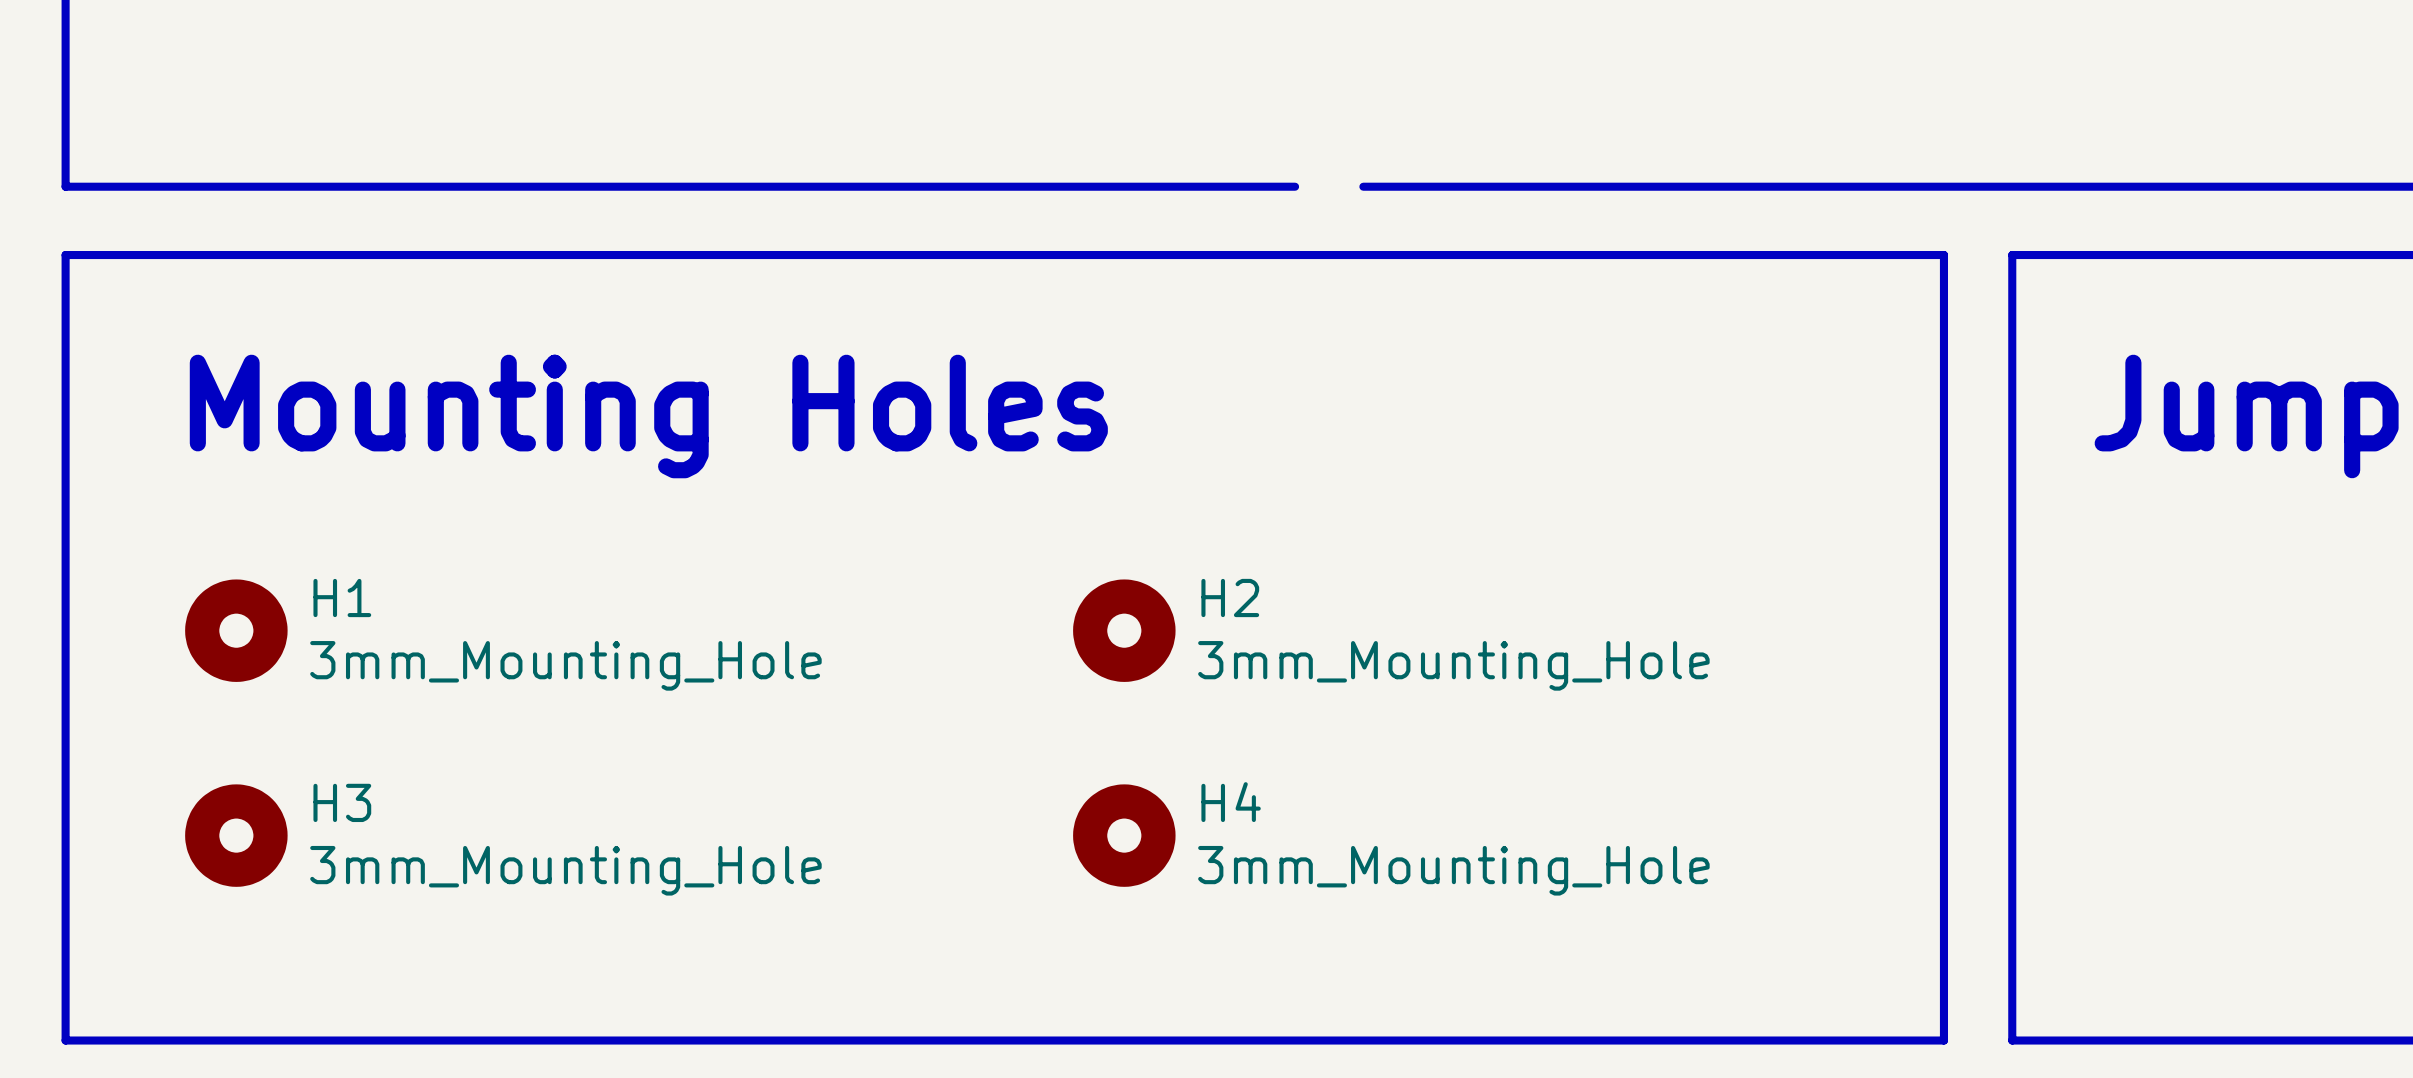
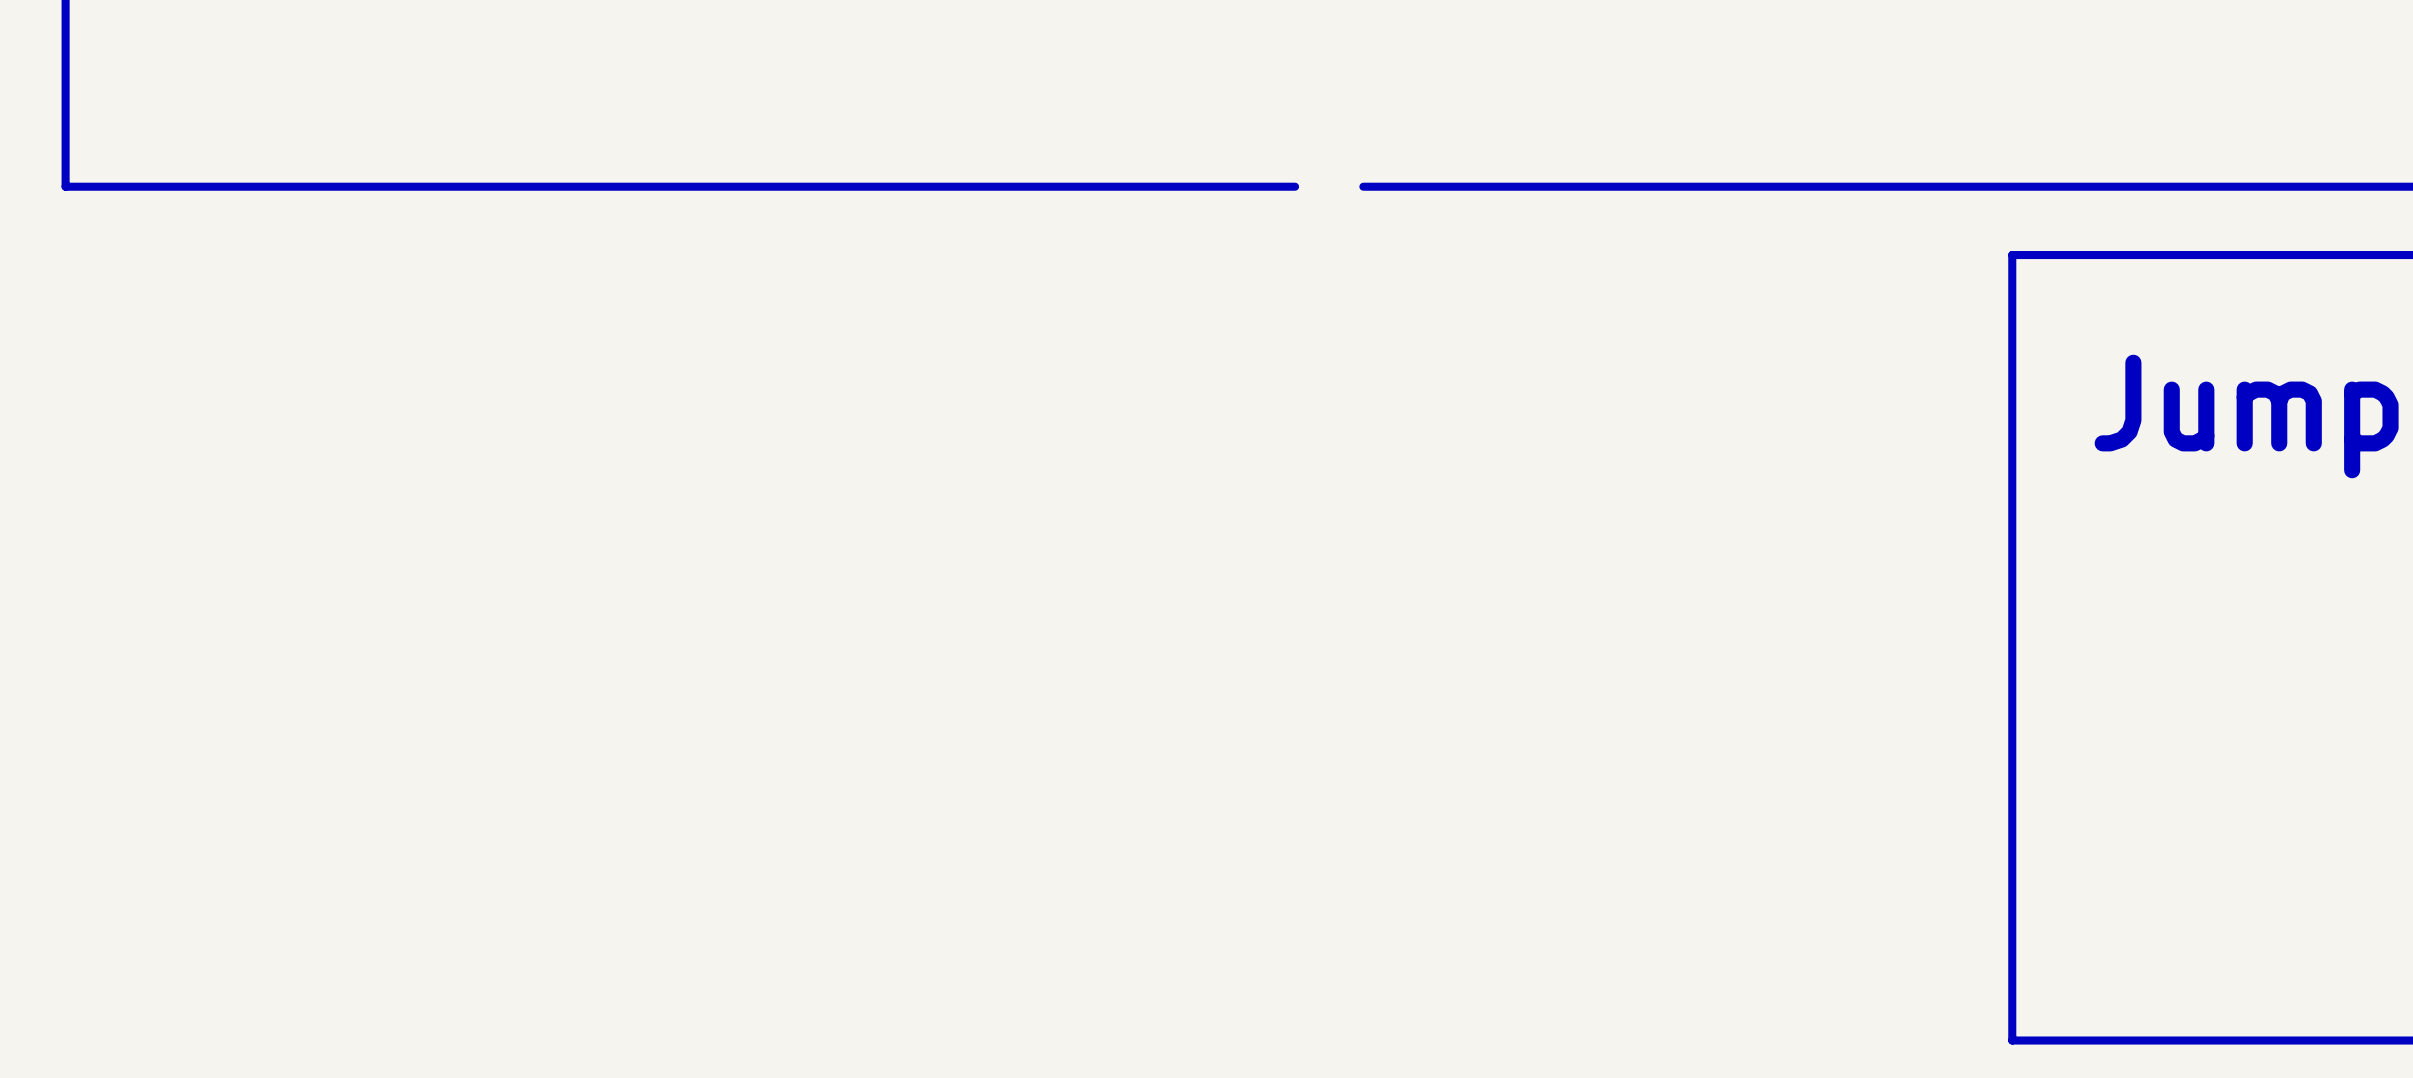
line: (65, 255) (65, 1040) (1943, 1040) (1943, 255) (65, 255) -> none
text: Mounting Holes (648, 416) -> none
H1: 3mm_Mounting_Hole (236, 630) -> none
H2: 3mm_Mounting_Hole (1124, 630) -> none
H3: 3mm_Mounting_Hole (236, 835) -> none
H4: 3mm_Mounting_Hole (1124, 835) -> none

